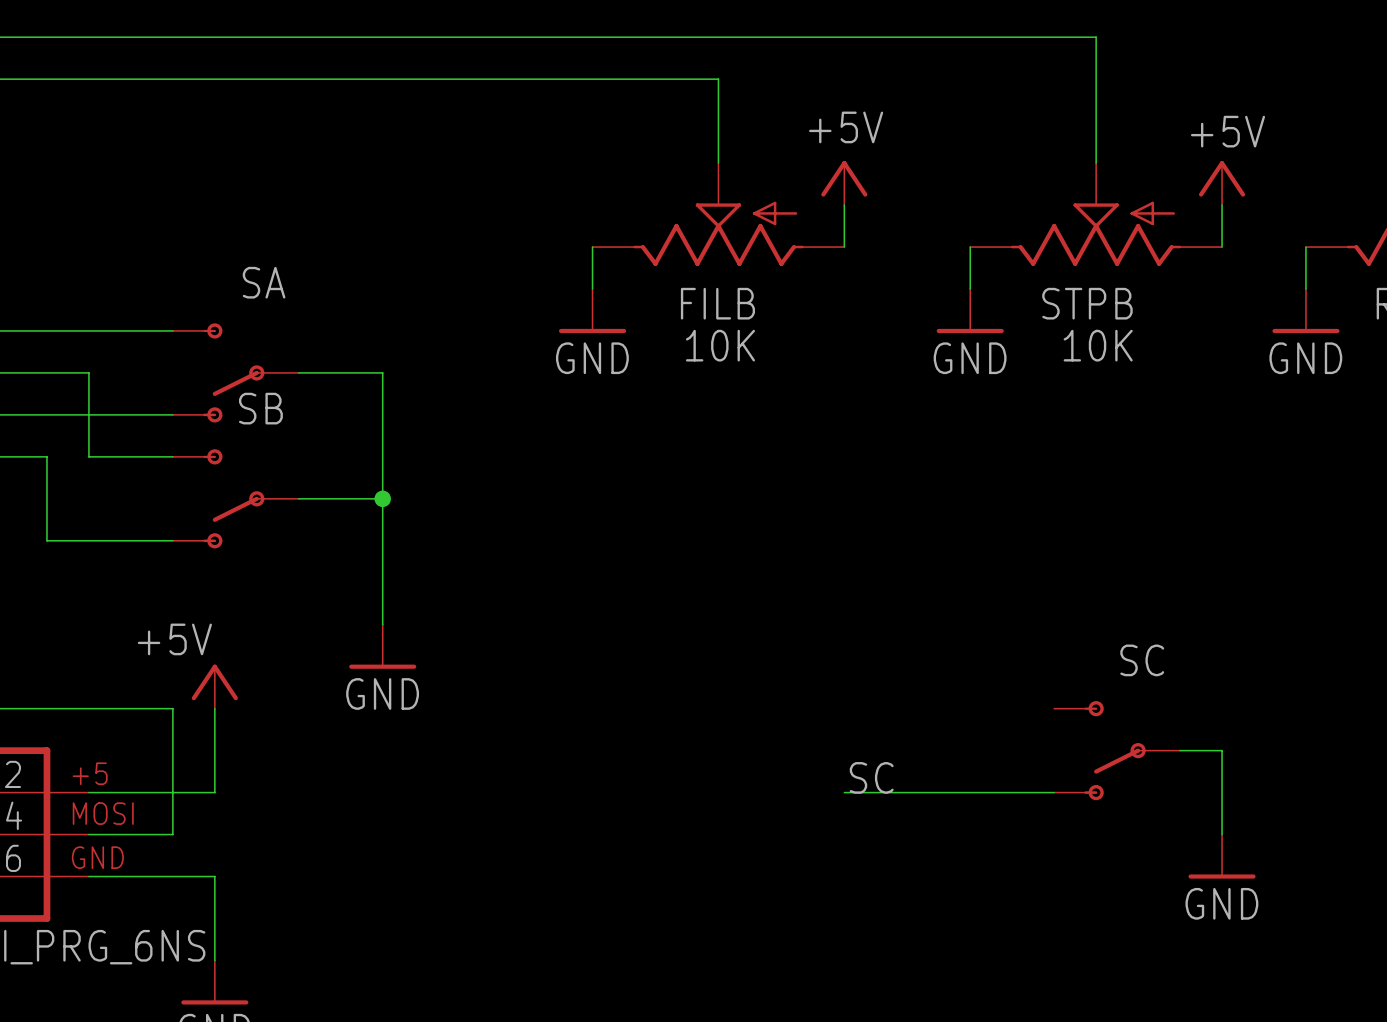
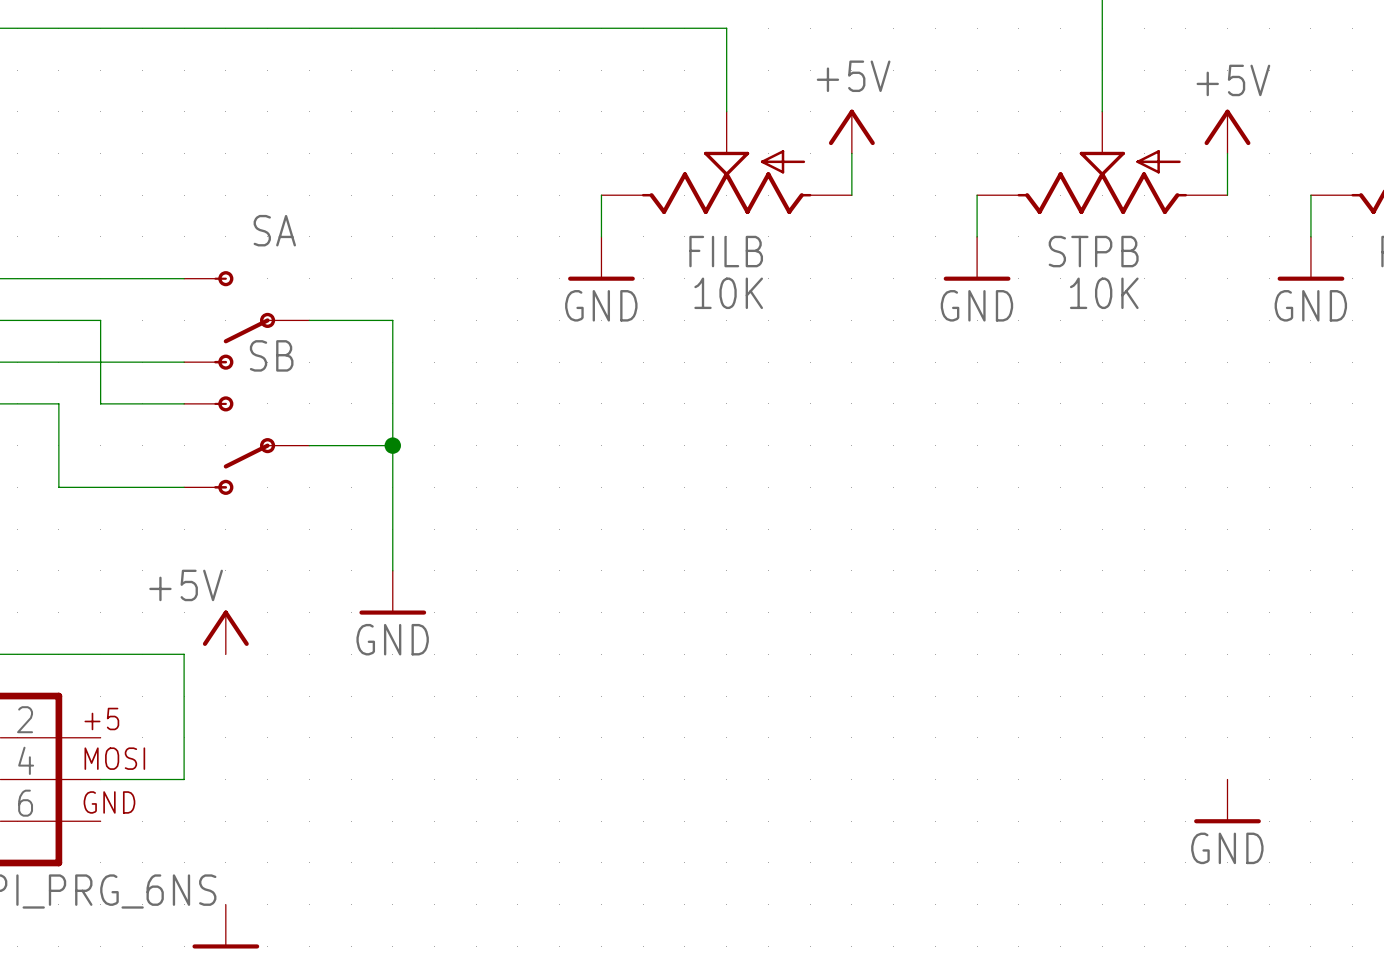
wire: (214, 708) (214, 792) (88, 792) -> none
SC: (1117, 750) -> none
wire: (1180, 750) (1222, 750) (1222, 834) -> none
label: SC (871, 777) -> none
wire: (844, 792) (1054, 792) -> none
wire: (88, 876) (214, 876) (214, 960) -> none

